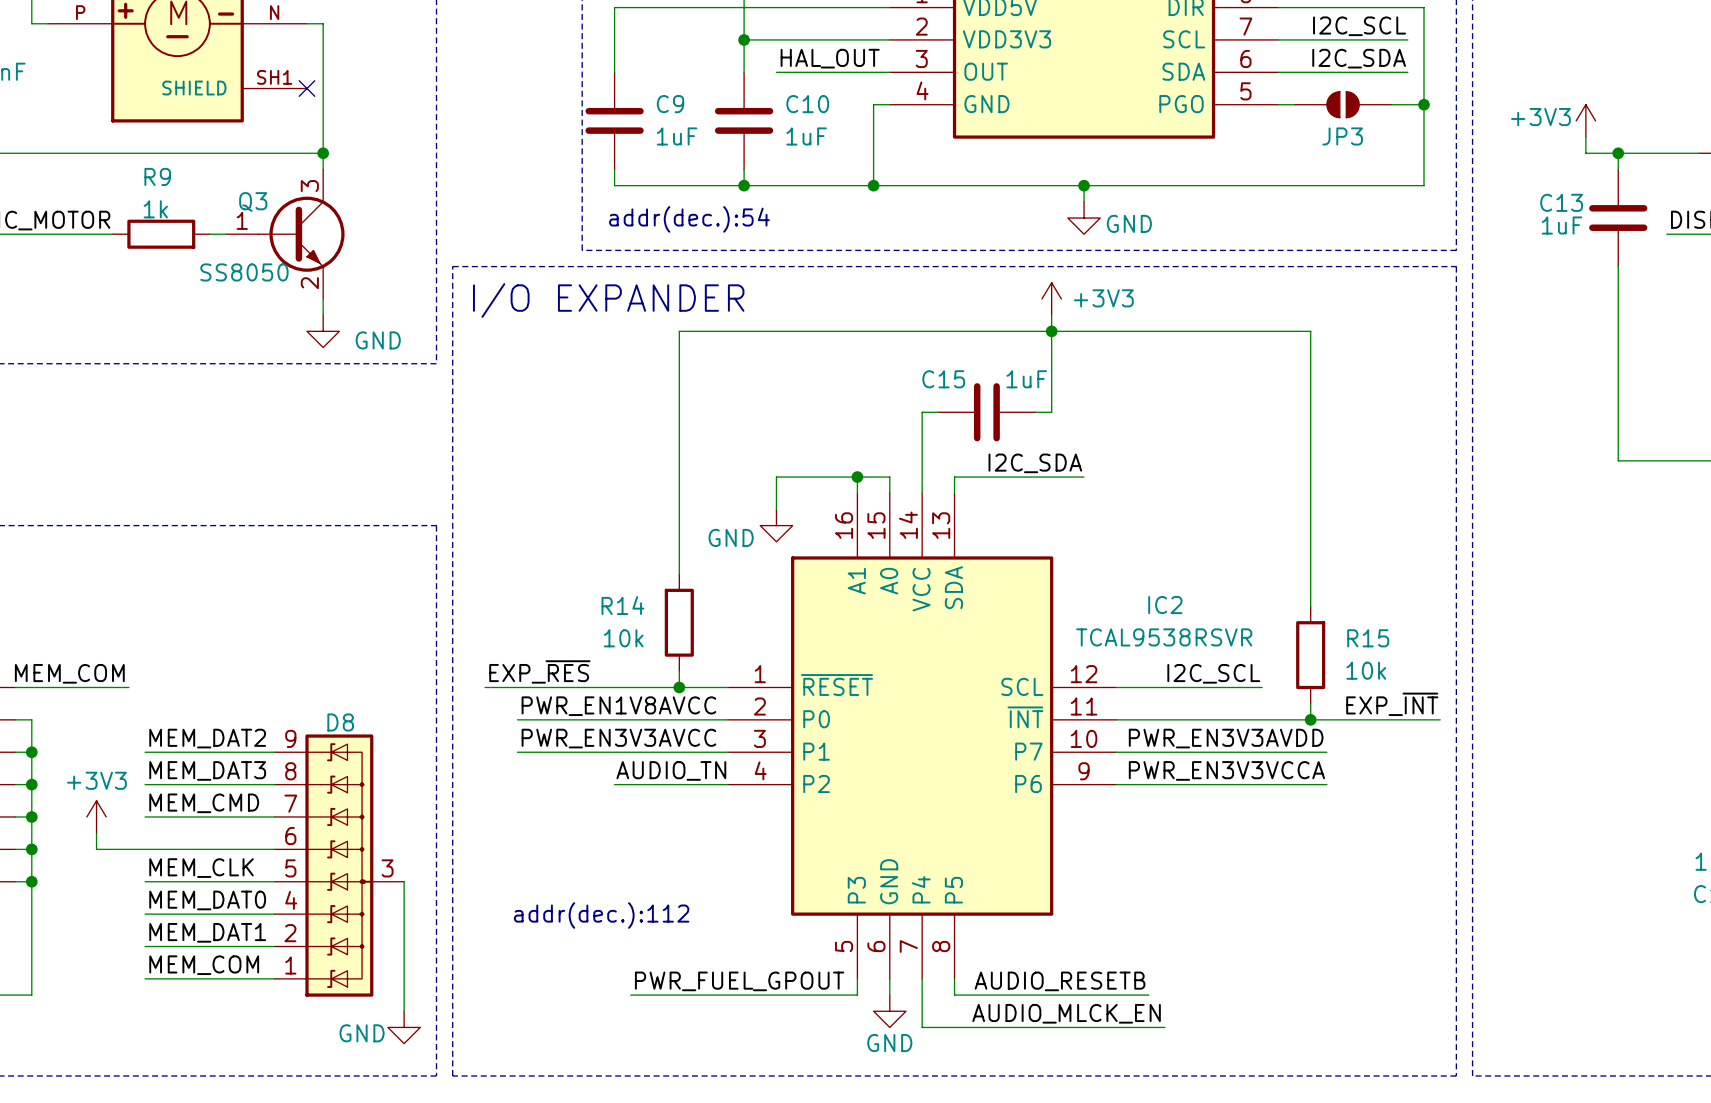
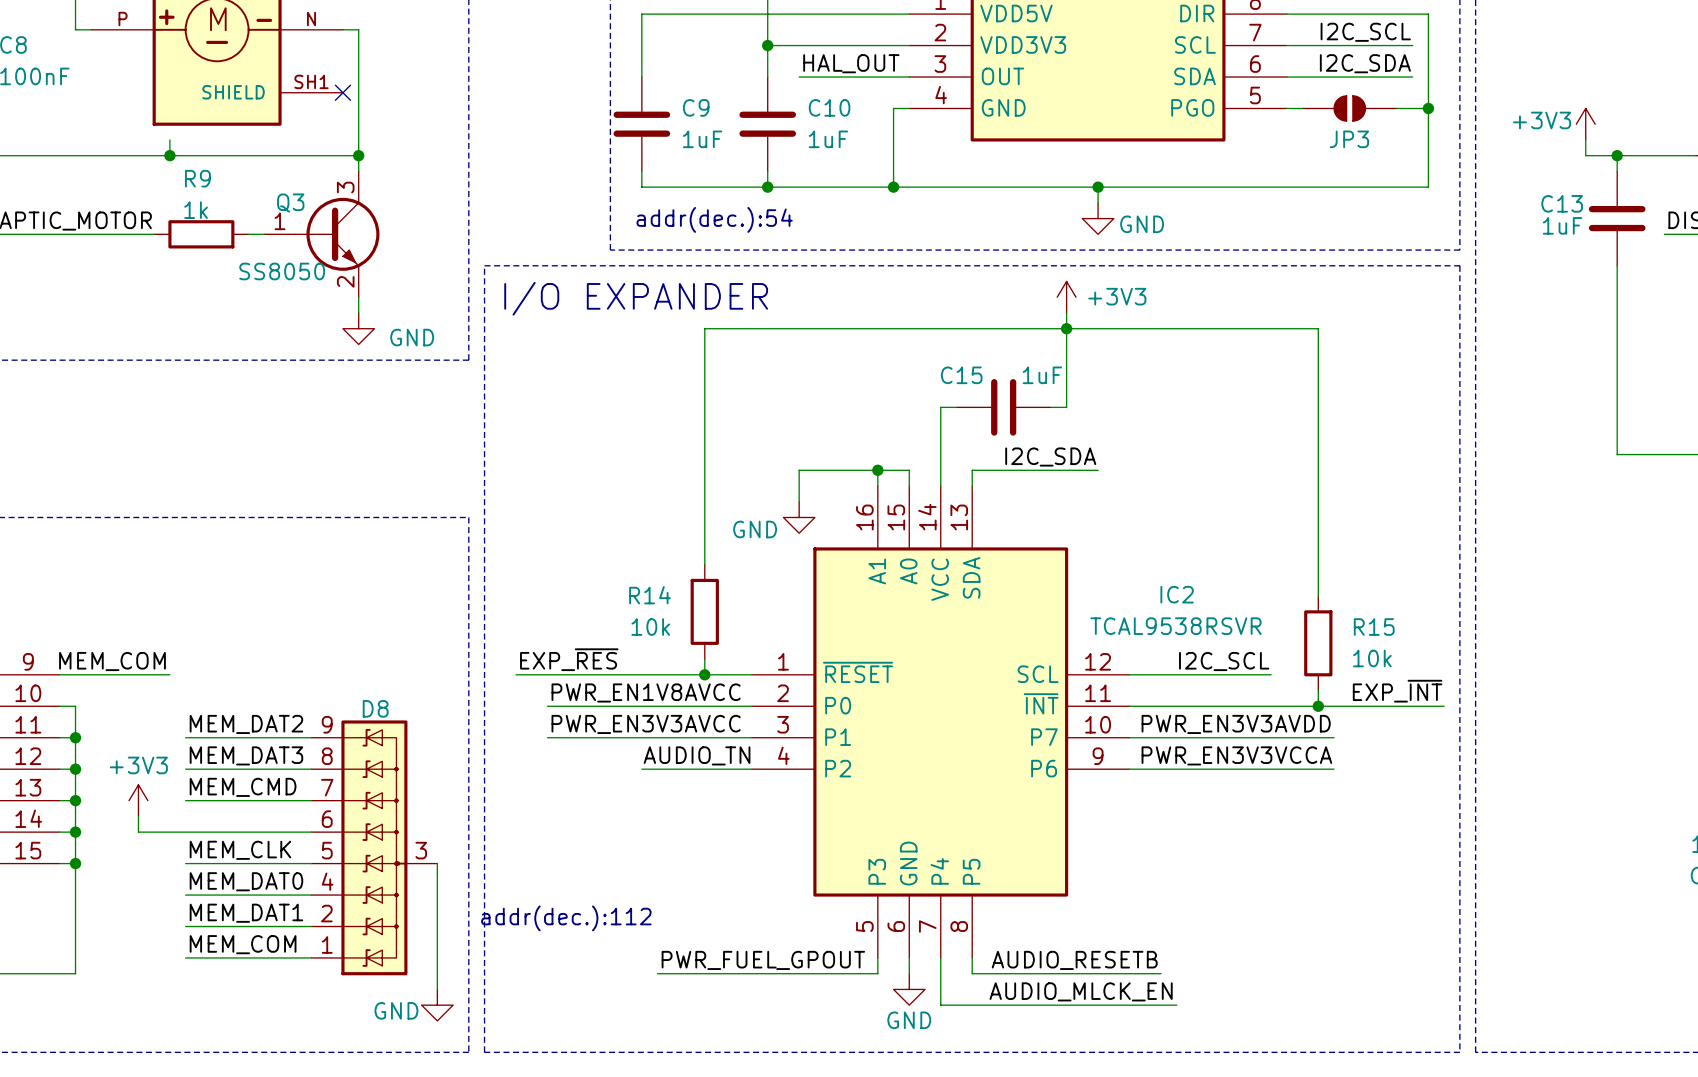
wire: none -> (169, 139) (169, 155)
junction: none -> (169, 155)
text position: addr(dec.):112 (601, 915) -> addr(dec.):112 (566, 918)

